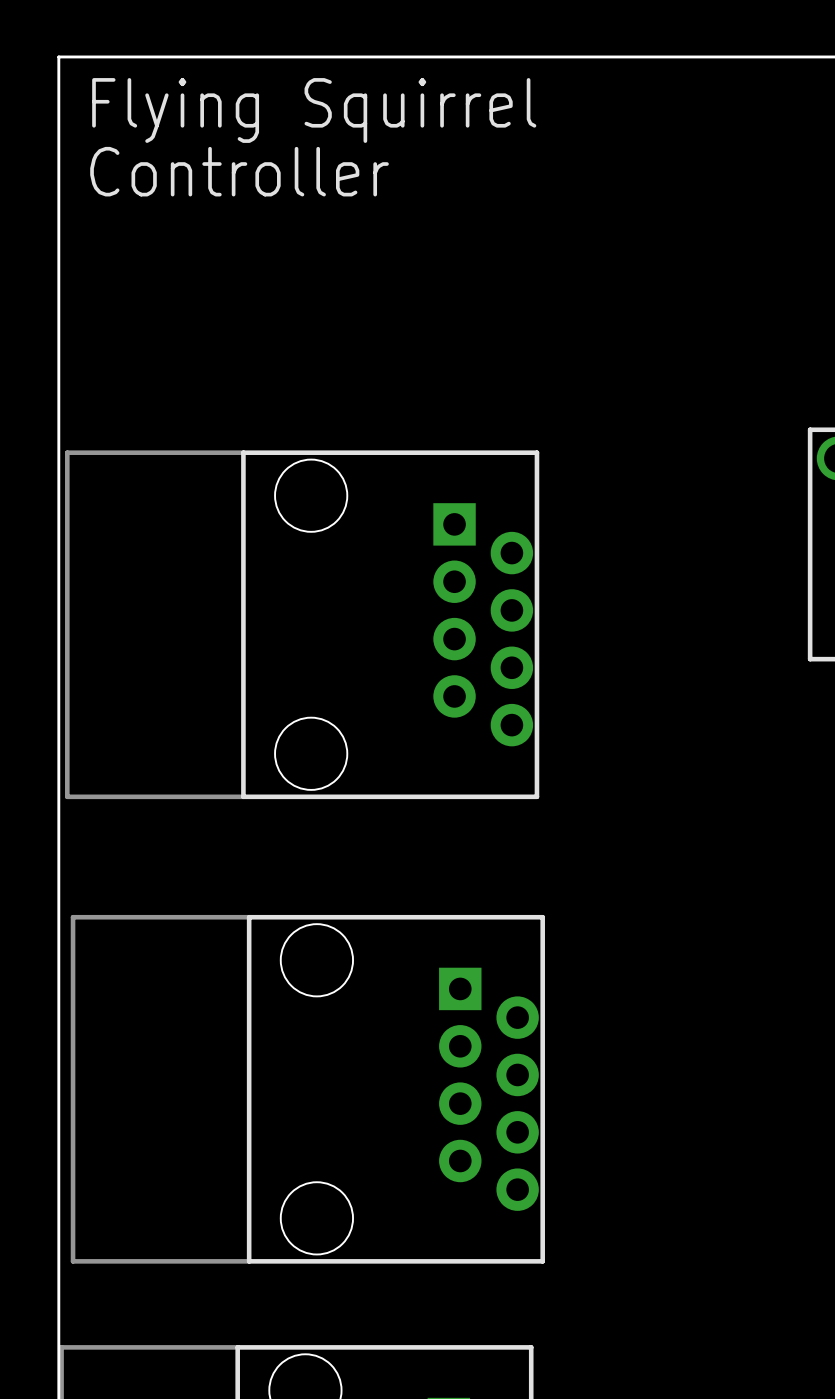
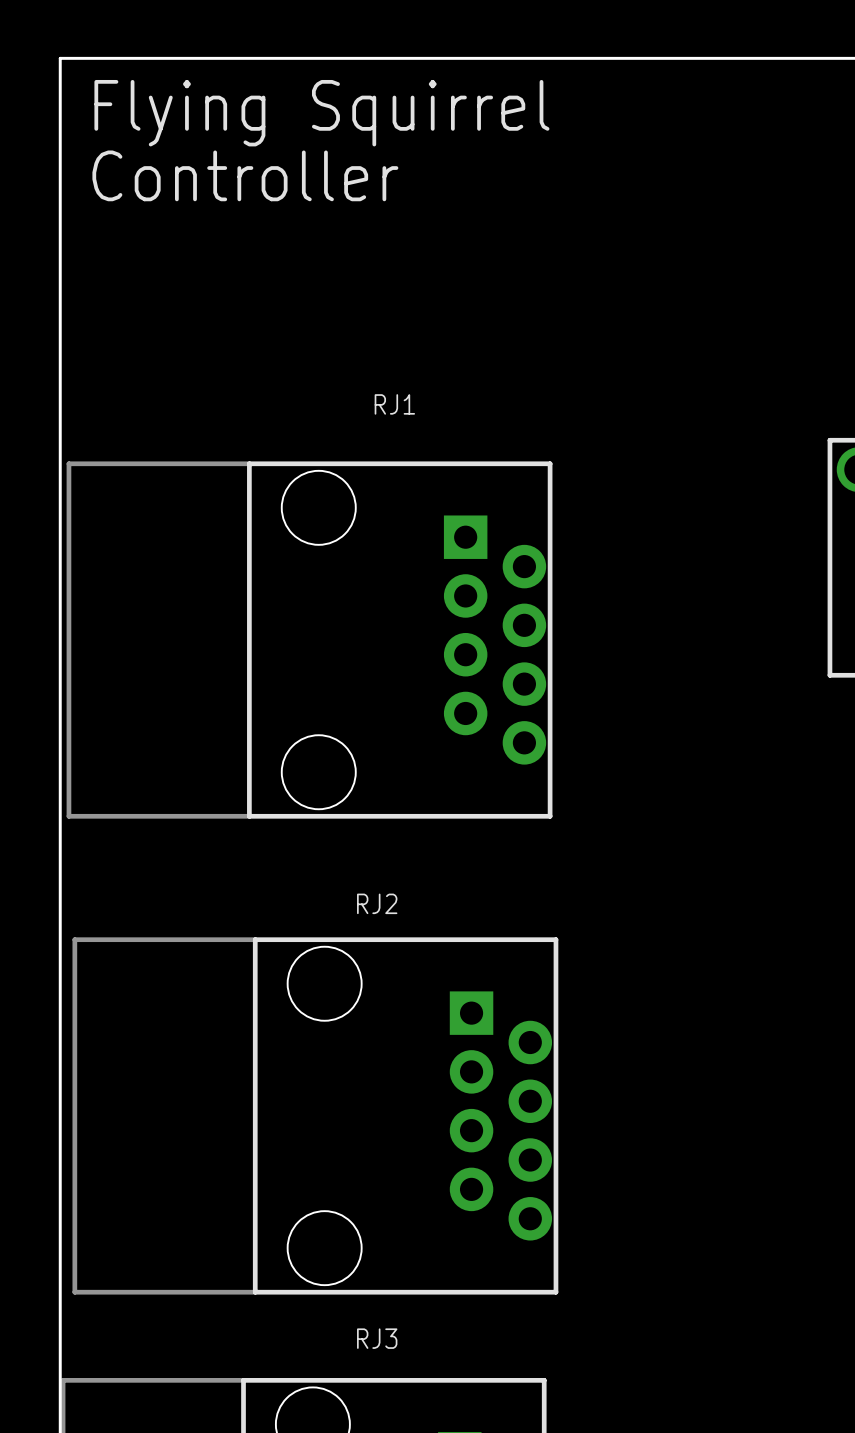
text: none -> RJ1 (394, 404)
text: none -> RJ2 (377, 903)
text: none -> RJ3 (377, 1338)

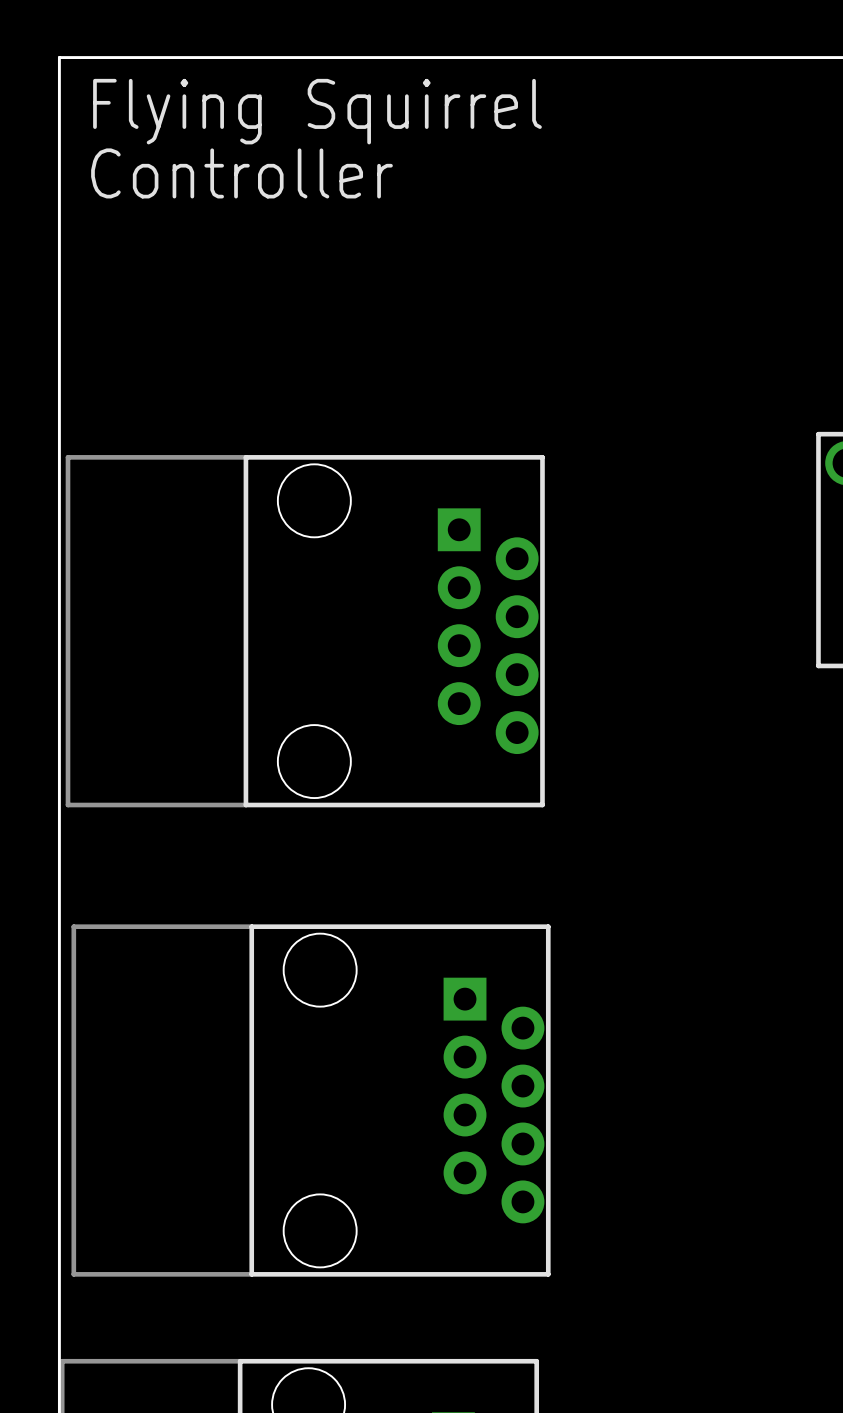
text: RJ1 (394, 404) -> none
text: RJ2 (377, 903) -> none
text: RJ3 (377, 1338) -> none

